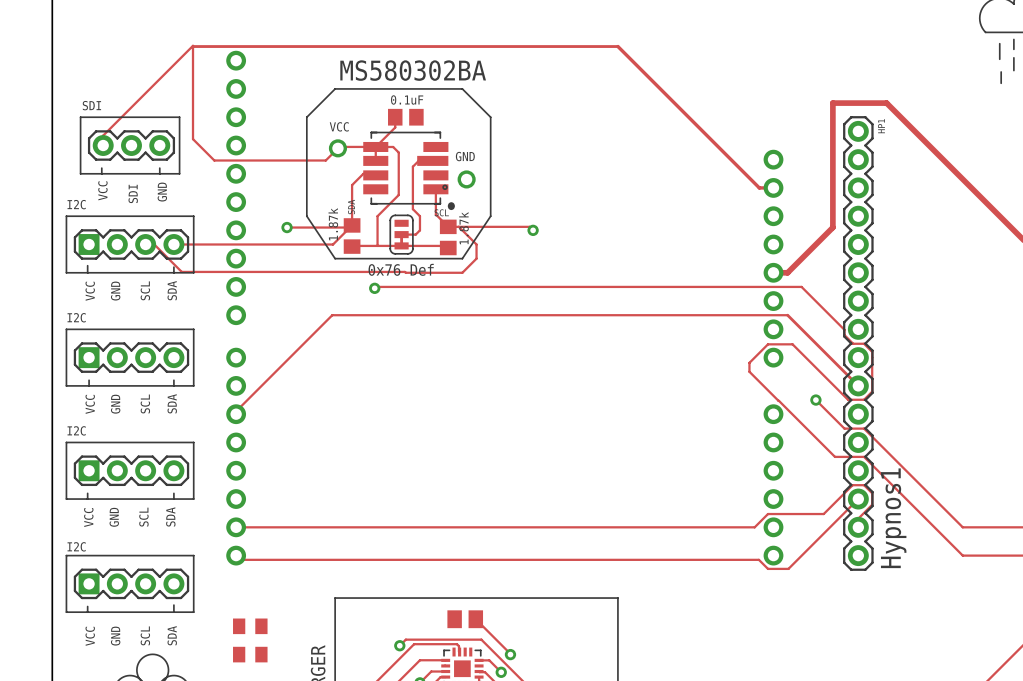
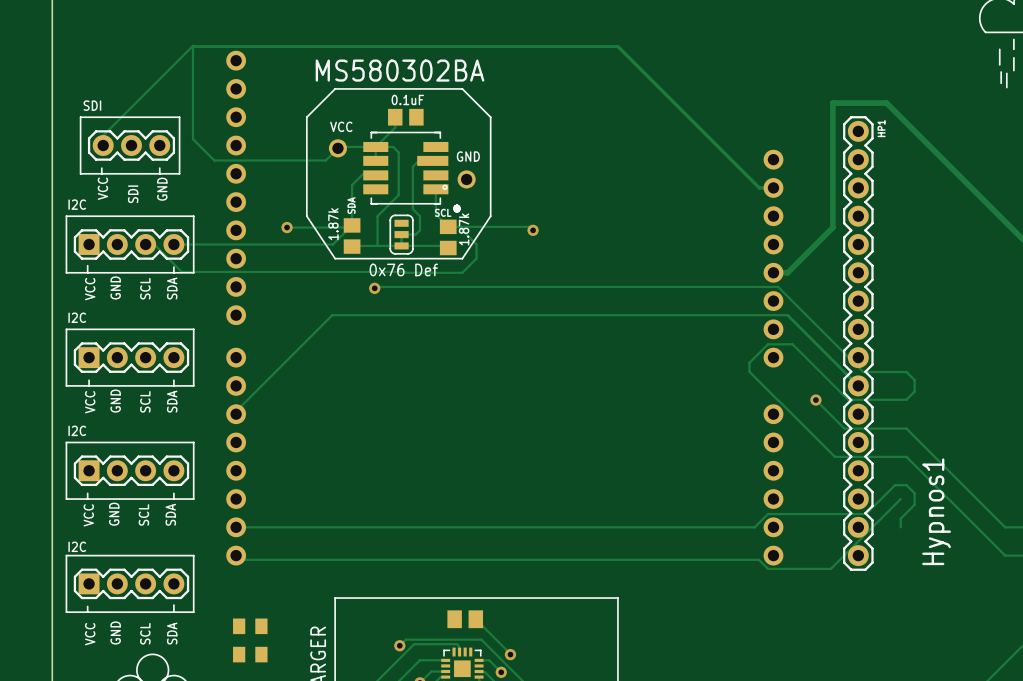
line: (999, 43) (999, 49) -> (999, 59) (999, 64)
line: none -> (1006, 73) (1006, 87)
track: (778, 286) (801, 286) (844, 329) (844, 335) (853, 343) (864, 343) (872, 351) (872, 391) (864, 399) -> (778, 286) (863, 372) (906, 372) (914, 380) (914, 391) (906, 399) (864, 399)
track: (864, 428) (962, 527) (1005, 527) -> (864, 428) (906, 428) (1005, 527)
track: (864, 456) (962, 555) (1005, 555) -> (864, 456) (906, 456) (1005, 555)
track: (858, 499) (788, 568) -> (900, 499) (830, 568) (788, 568)
track: (823, 514) (852, 485) (864, 485) (872, 493) (872, 504) (858, 518) (858, 527) -> (823, 514) (866, 514) (895, 485) (906, 485) (914, 493) (914, 504) (900, 518) (900, 527)
text position: Hypnos1 (893, 518) -> Hypnos1 (936, 511)

